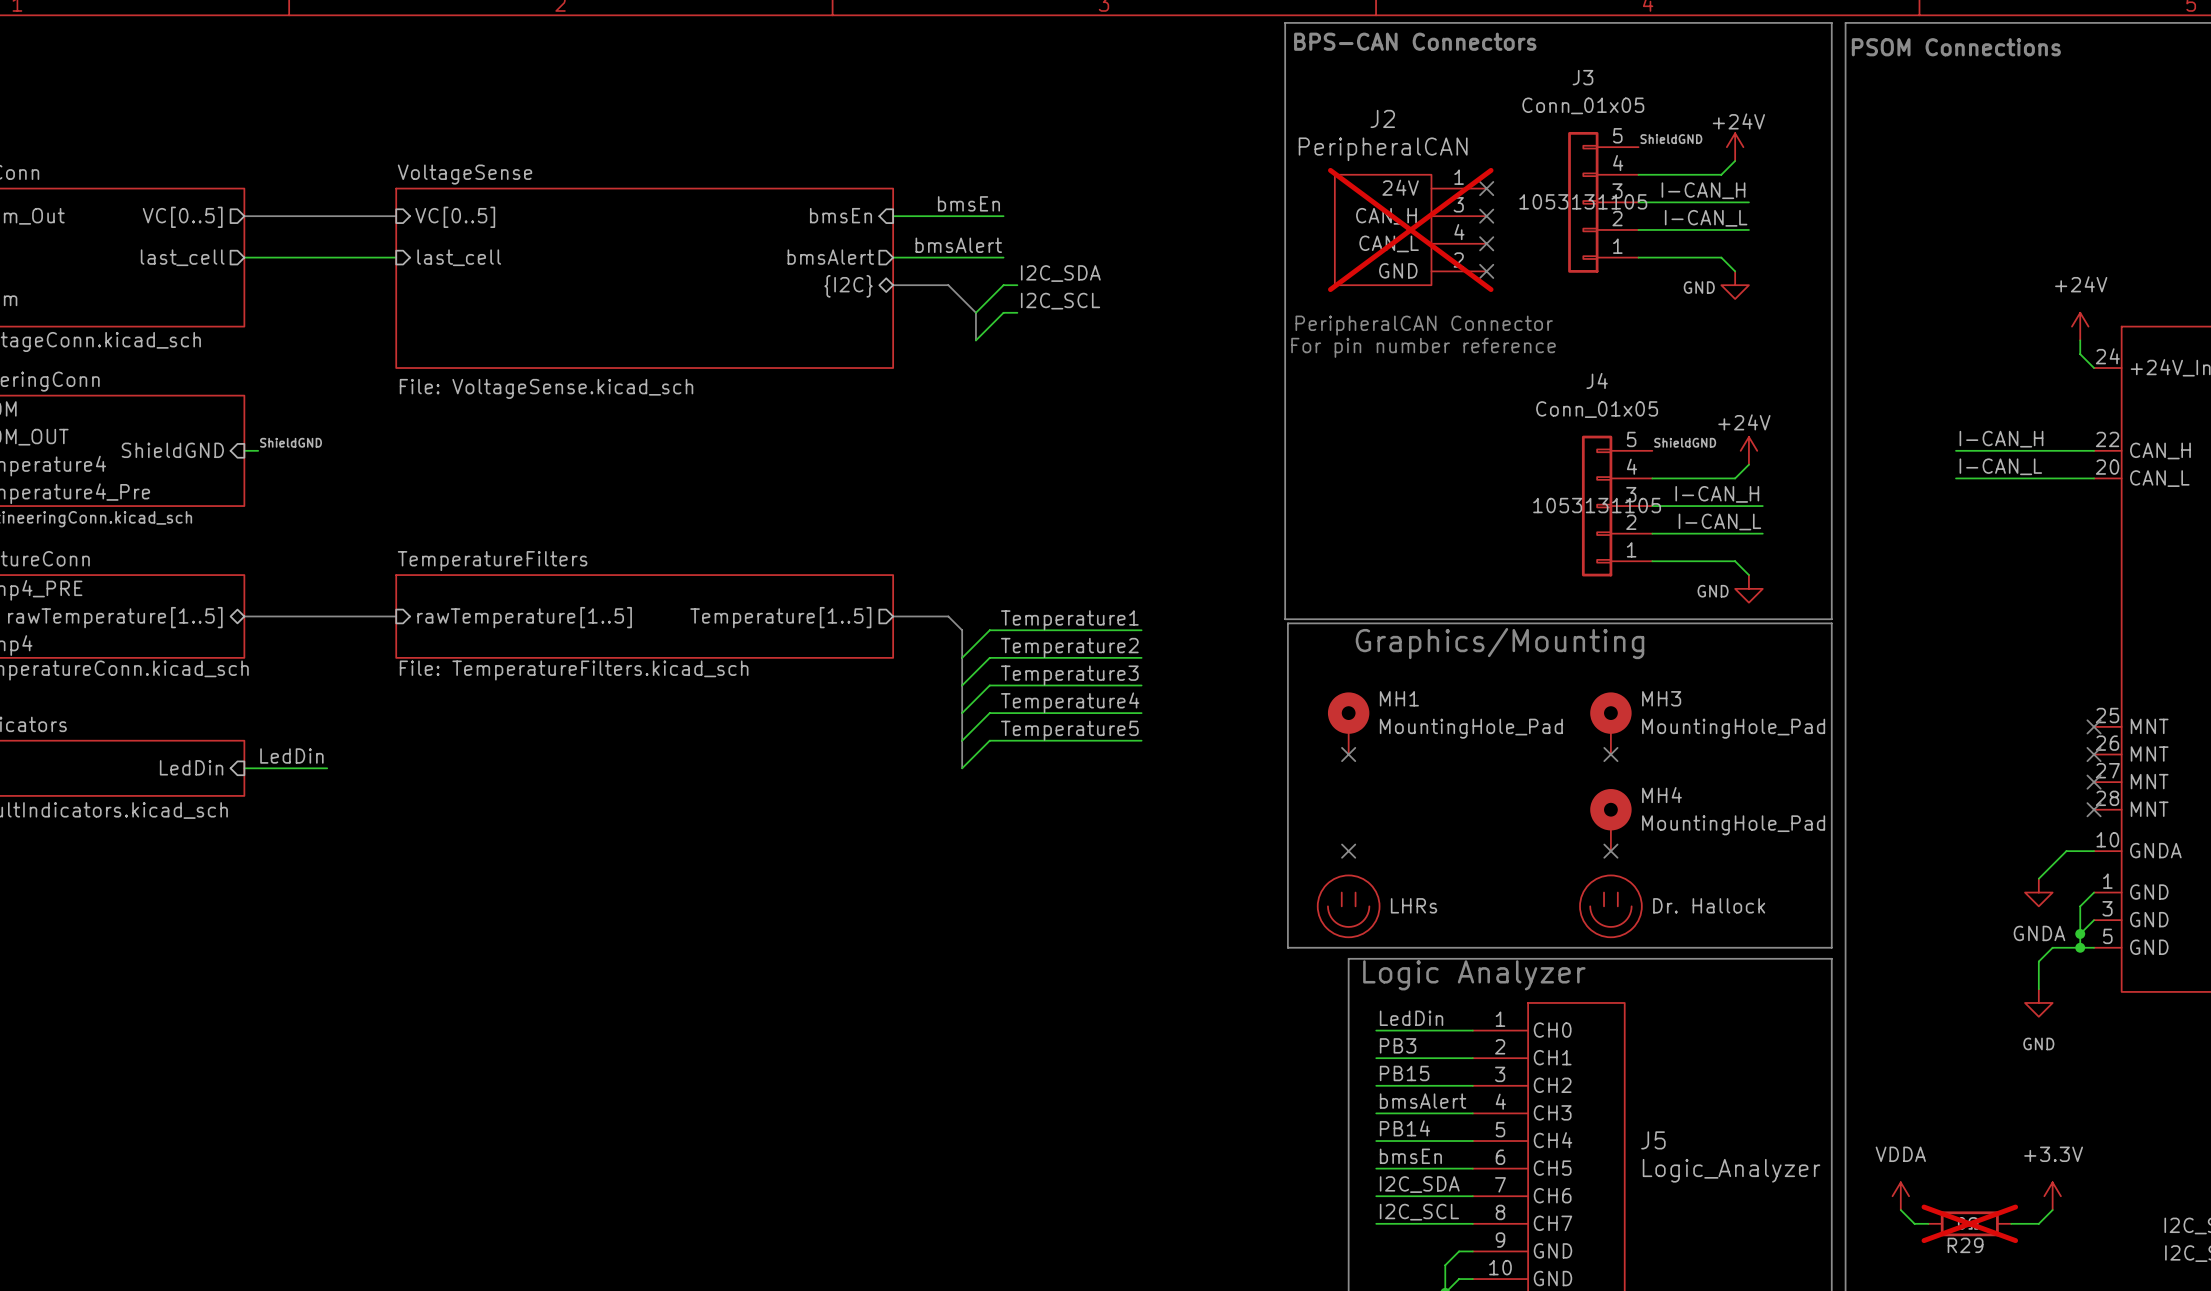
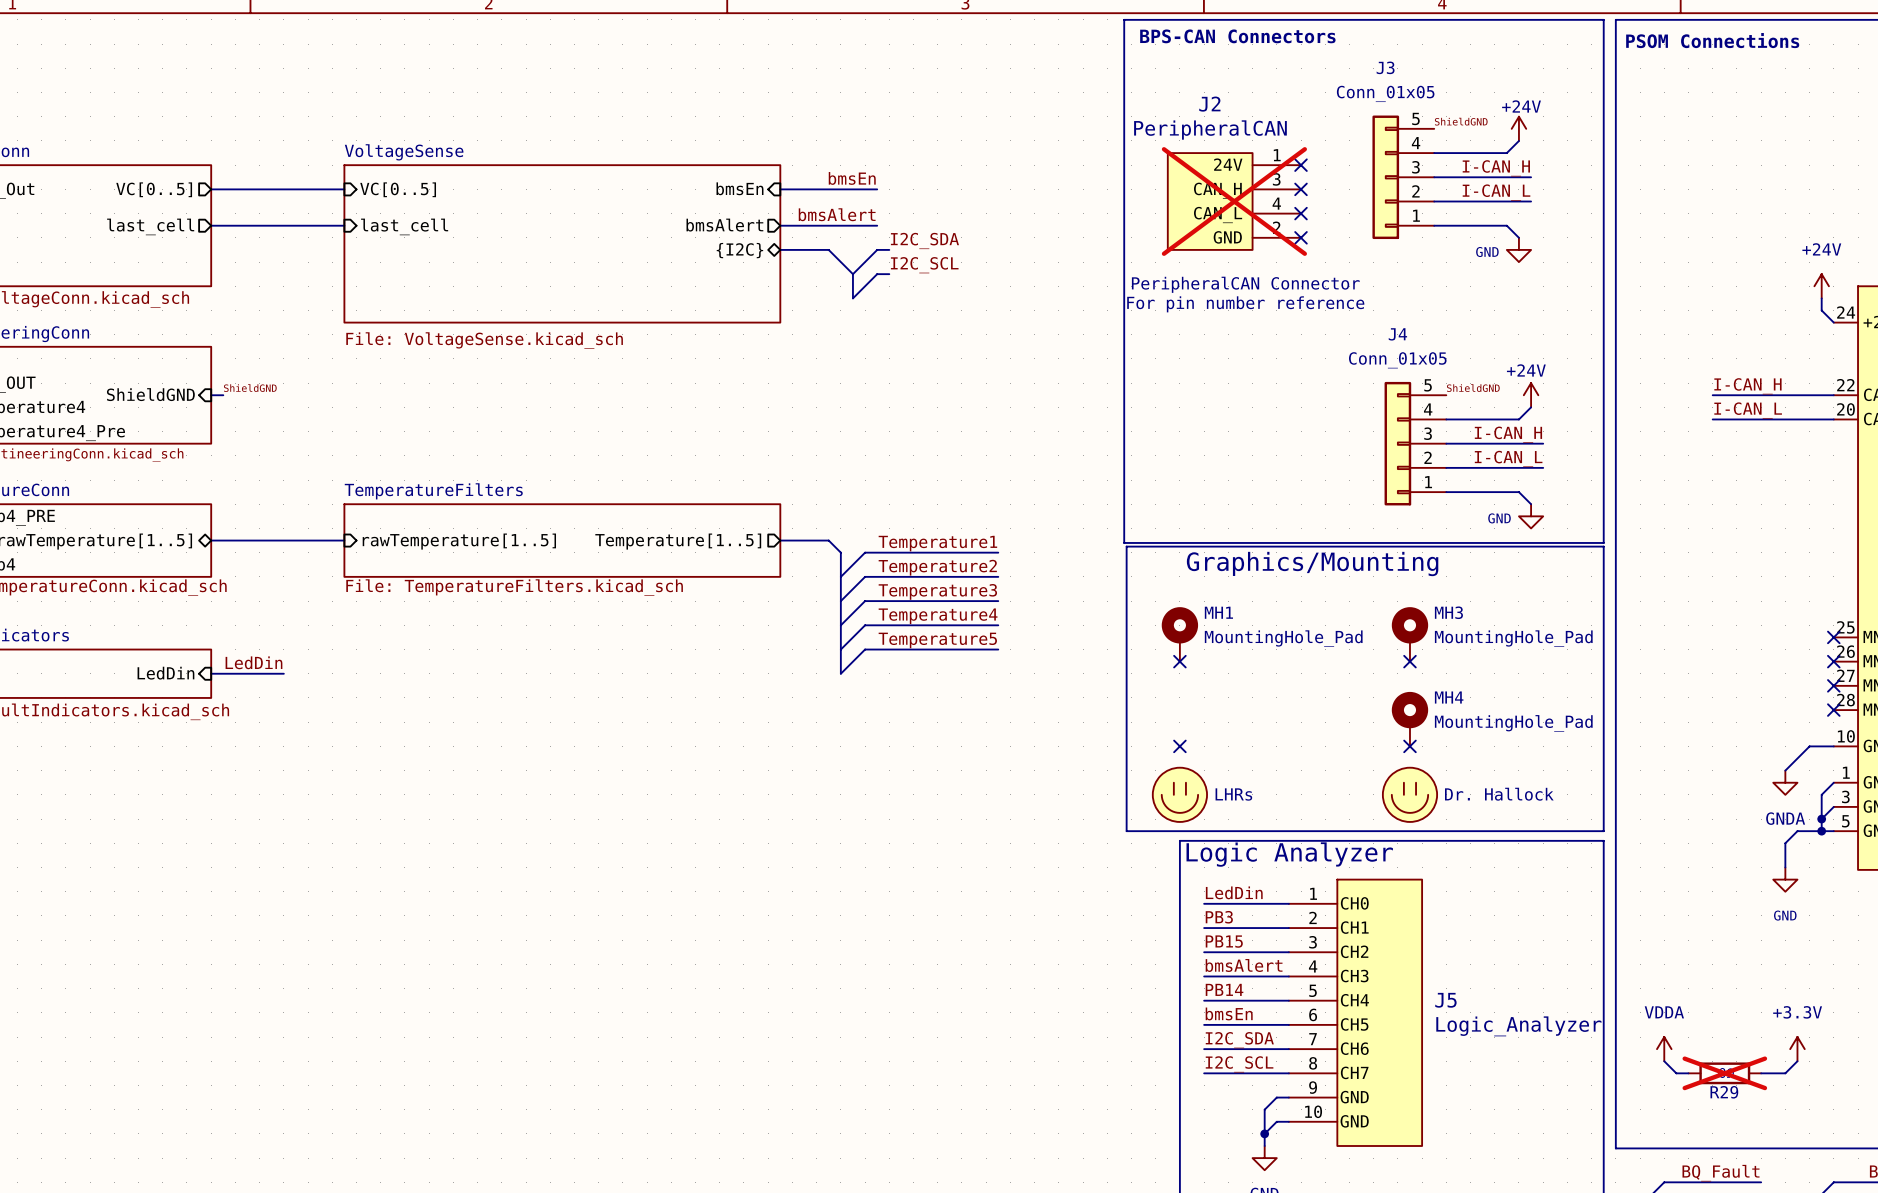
J3 text: 1053131105 (1583, 201) -> none
J4 text: 1053131105 (1597, 505) -> none

